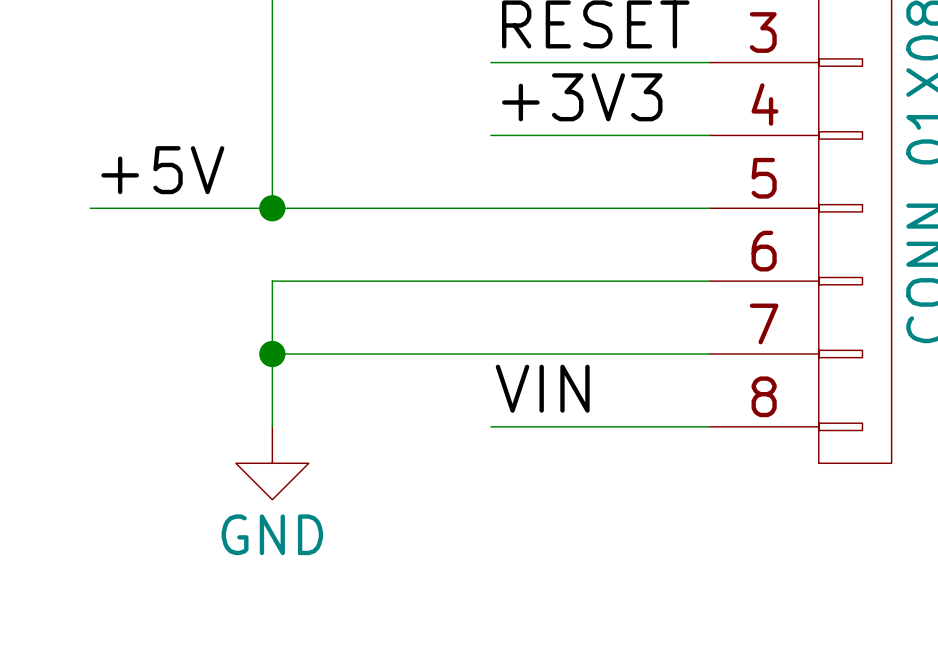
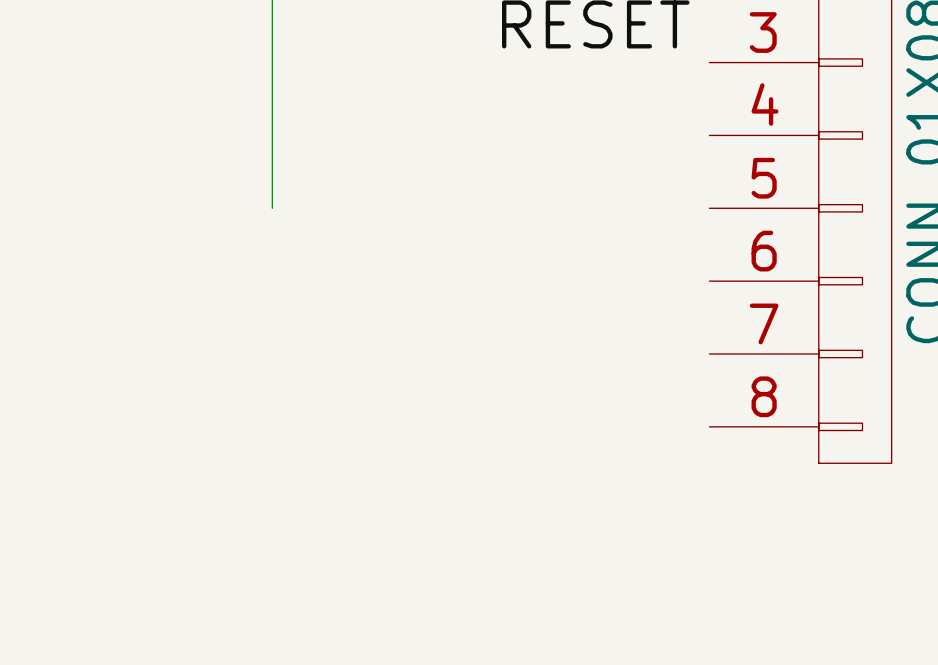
wire: (490, 62) (709, 62) -> none
label: +3V3 (582, 97) -> none
wire: (490, 135) (709, 135) -> none
label: +5V (162, 170) -> none
wire: (90, 208) (709, 208) -> none
junction: (272, 208) -> none
wire: (709, 281) (272, 281) (272, 426) -> none
wire: (272, 354) (709, 354) -> none
junction: (272, 354) -> none
label: VIN (542, 388) -> none
wire: (490, 426) (709, 426) -> none
power symbol: GND (272, 463) -> none

